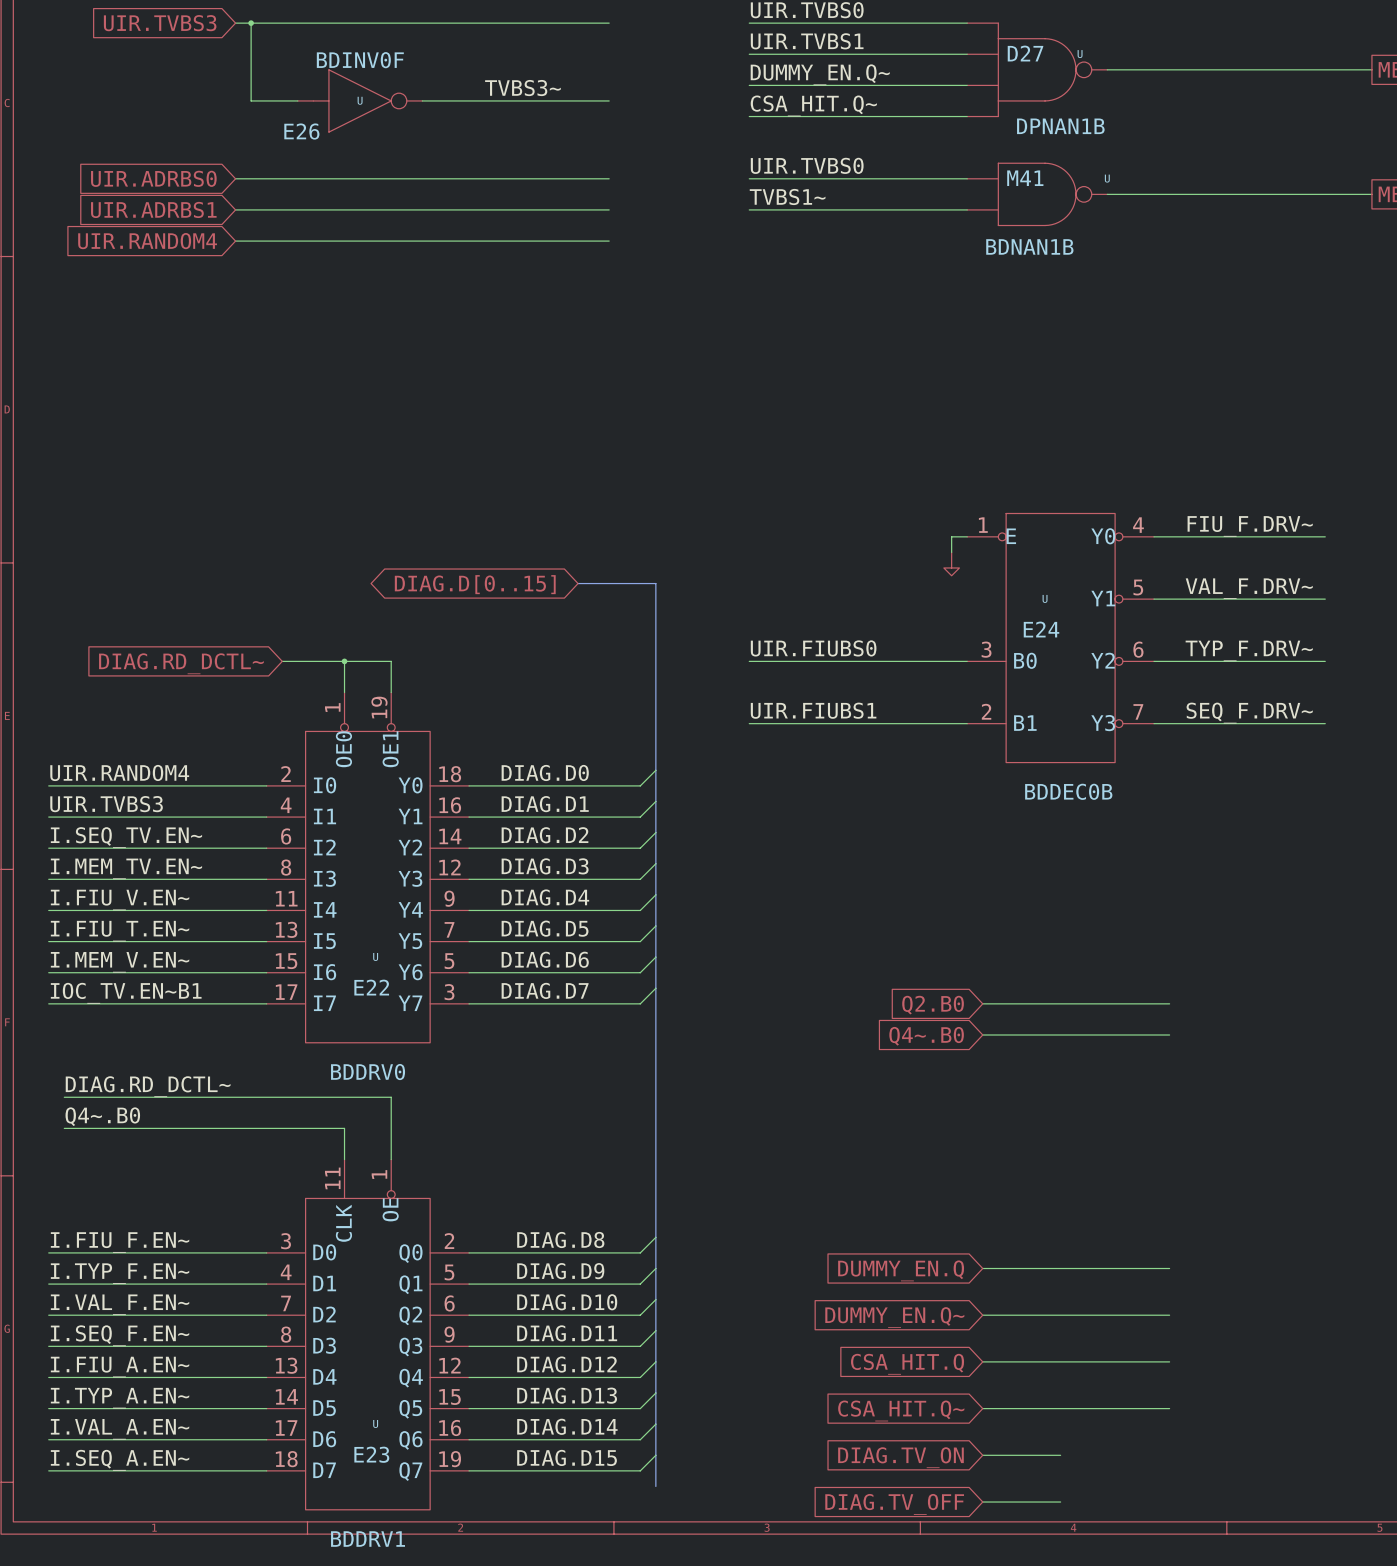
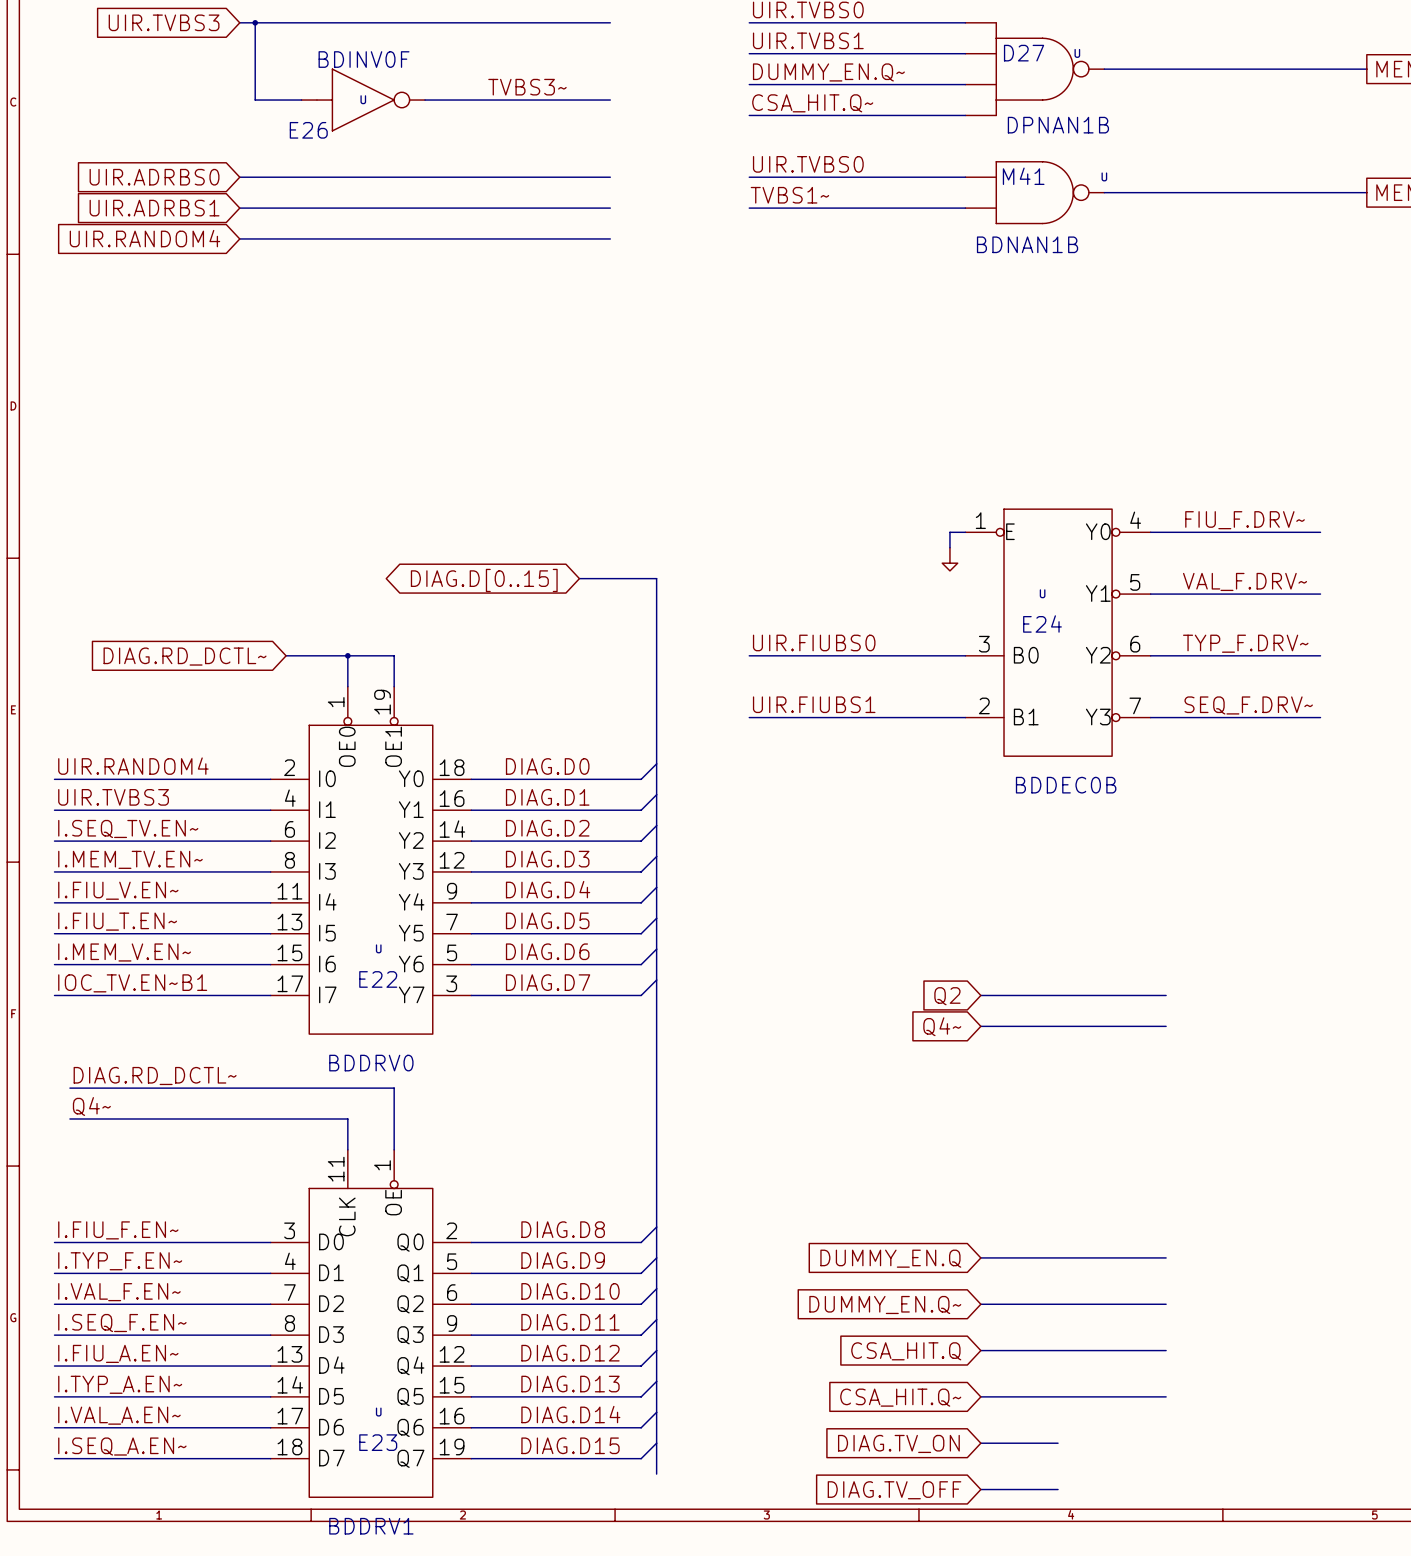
global label: Q2.B0 (933, 1005) -> Q2 (947, 996)
global label: Q4~.B0 (926, 1036) -> Q4~ (942, 1026)
label: Q4~.B0 (102, 1116) -> Q4~ (91, 1106)

